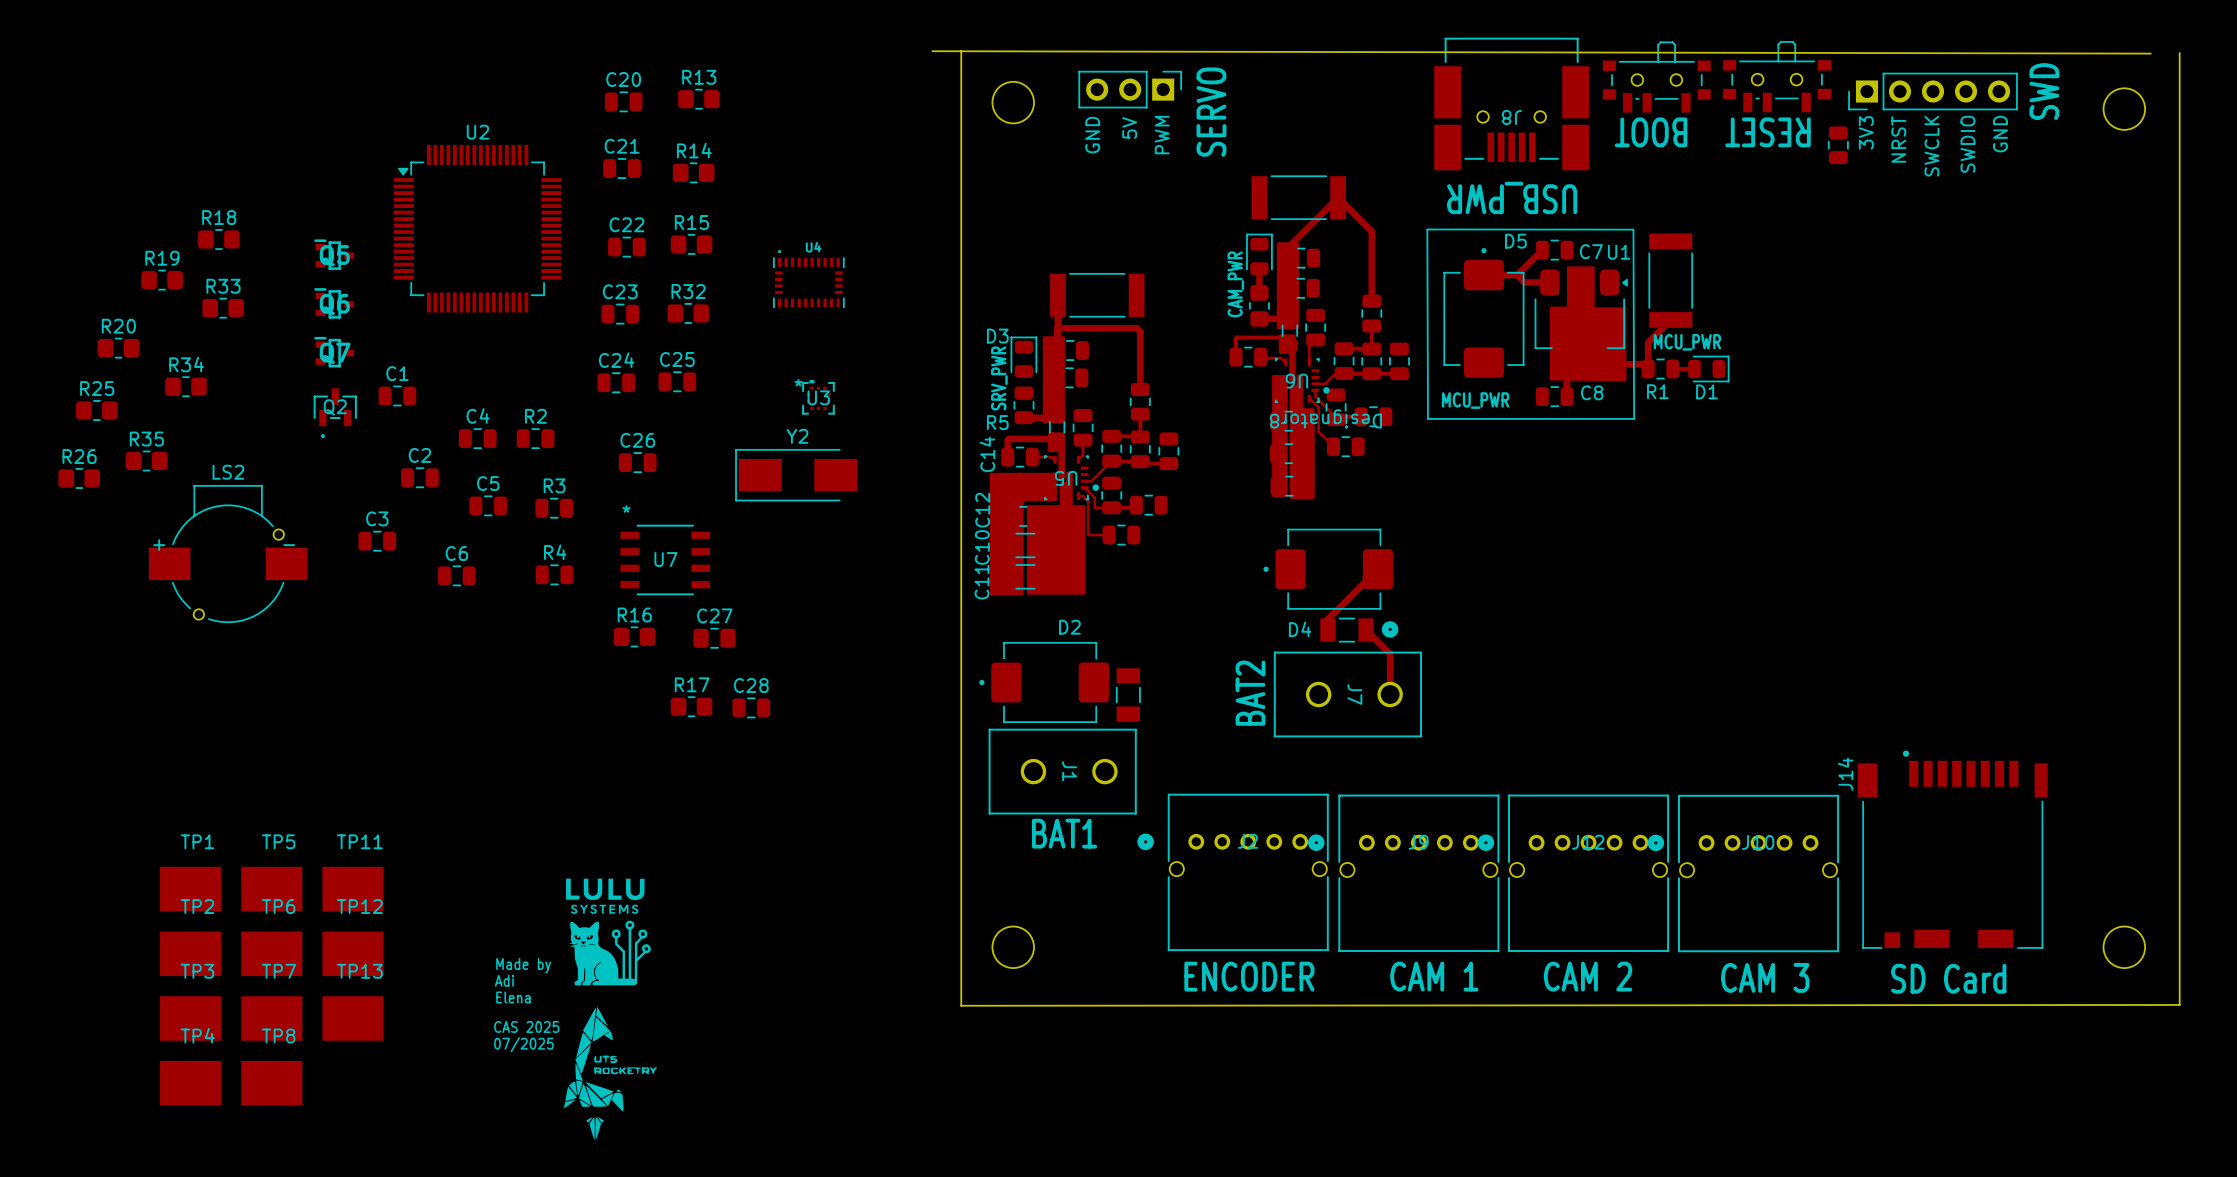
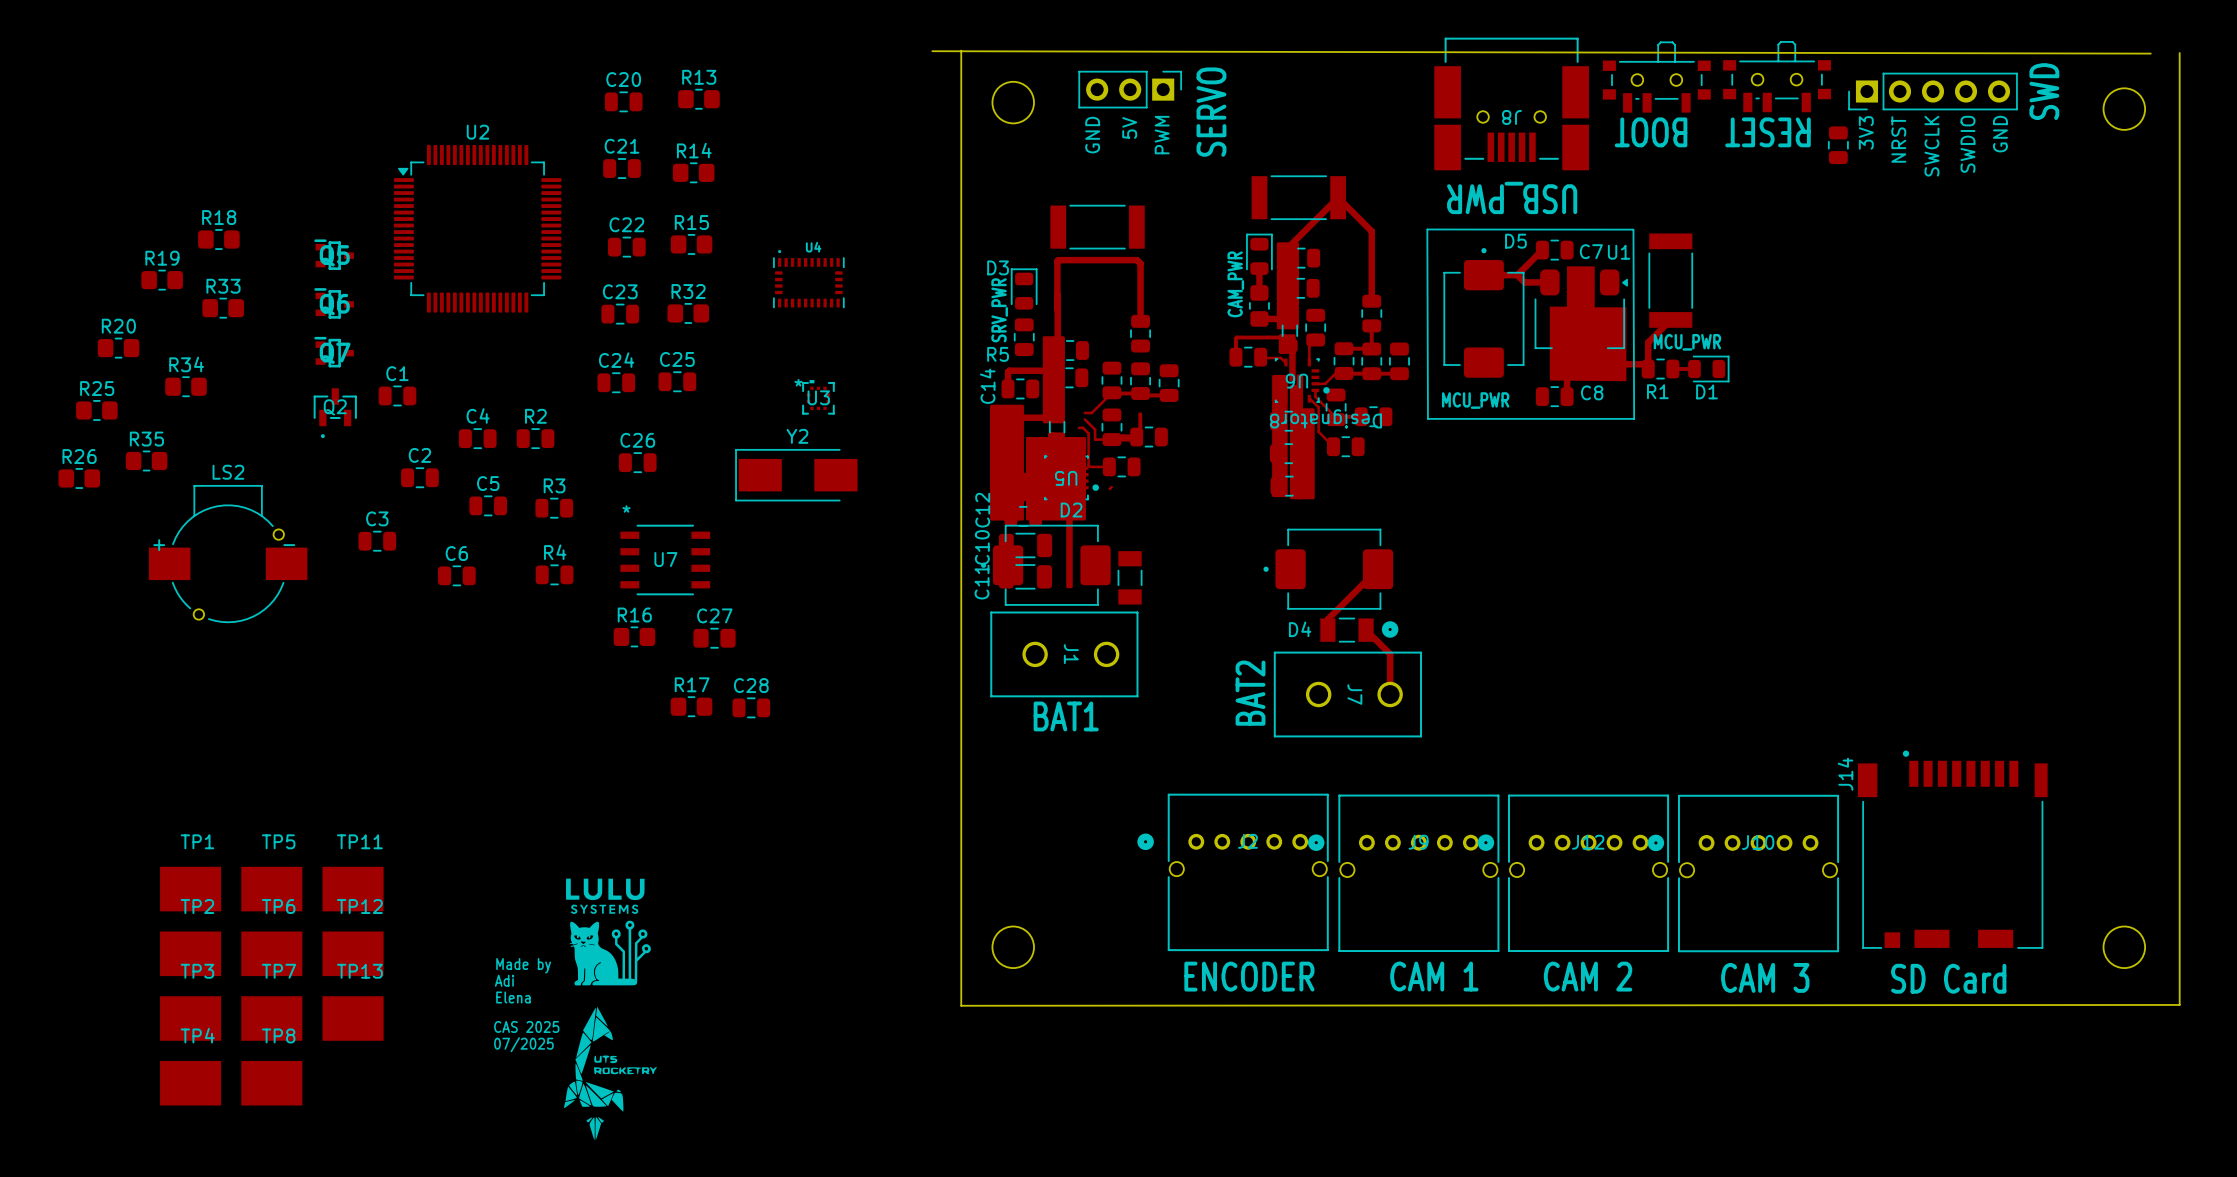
part position: (1097, 295) -> (1097, 227)
part: none -> (1140, 333)
D3 position: (1023, 357) -> (1024, 289)
track: (1057, 377) (1058, 328) (1136, 328) (1140, 331) (1140, 389) -> (1057, 309) (1058, 260) (1137, 260) (1140, 263) (1140, 321)
text position: SRV_PWR (999, 378) -> SRV_PWR (999, 310)
part: none -> (1111, 380)
part: none -> (1140, 381)
part: none -> (1169, 383)
part: (1140, 401) -> none
drawing: none -> [990, 404, 1087, 521]
R5 position: (1024, 405) -> (1024, 337)
part: (1083, 427) -> none
part: none -> (1111, 427)
part: none -> (1149, 437)
track: (1057, 442) (1053, 438) (1009, 438) (1007, 457) -> (1057, 373) (1054, 370) (1009, 370) (1008, 388)
part: (1111, 448) -> none
part: (1140, 449) -> none
part: (1168, 451) -> none
C14 position: (1020, 457) -> (1020, 388)
track: (1168, 463) (1111, 461) (1091, 481) (1084, 481) -> (1169, 395) (1111, 392) (1091, 412) (1084, 412)
part: none -> (1121, 466)
drawing: [989, 472, 1086, 596] -> none
track: (1084, 487) (1094, 497) (1094, 507) (1133, 507) (1136, 505) -> (1084, 419) (1095, 429) (1095, 439) (1134, 439) (1136, 437)
part: (1111, 495) -> none
track: (1078, 496) (1082, 496) (1088, 501) (1088, 533) (1109, 535) -> (1078, 427) (1083, 427) (1088, 433) (1088, 465) (1109, 466)
part: (1148, 505) -> none
part: (1121, 535) -> none
D2 position: (1044, 682) -> (1045, 565)
part position: (1128, 695) -> (1130, 577)
J1 position: (1062, 771) -> (1064, 654)
text position: BAT1 (1064, 833) -> BAT1 (1066, 716)

